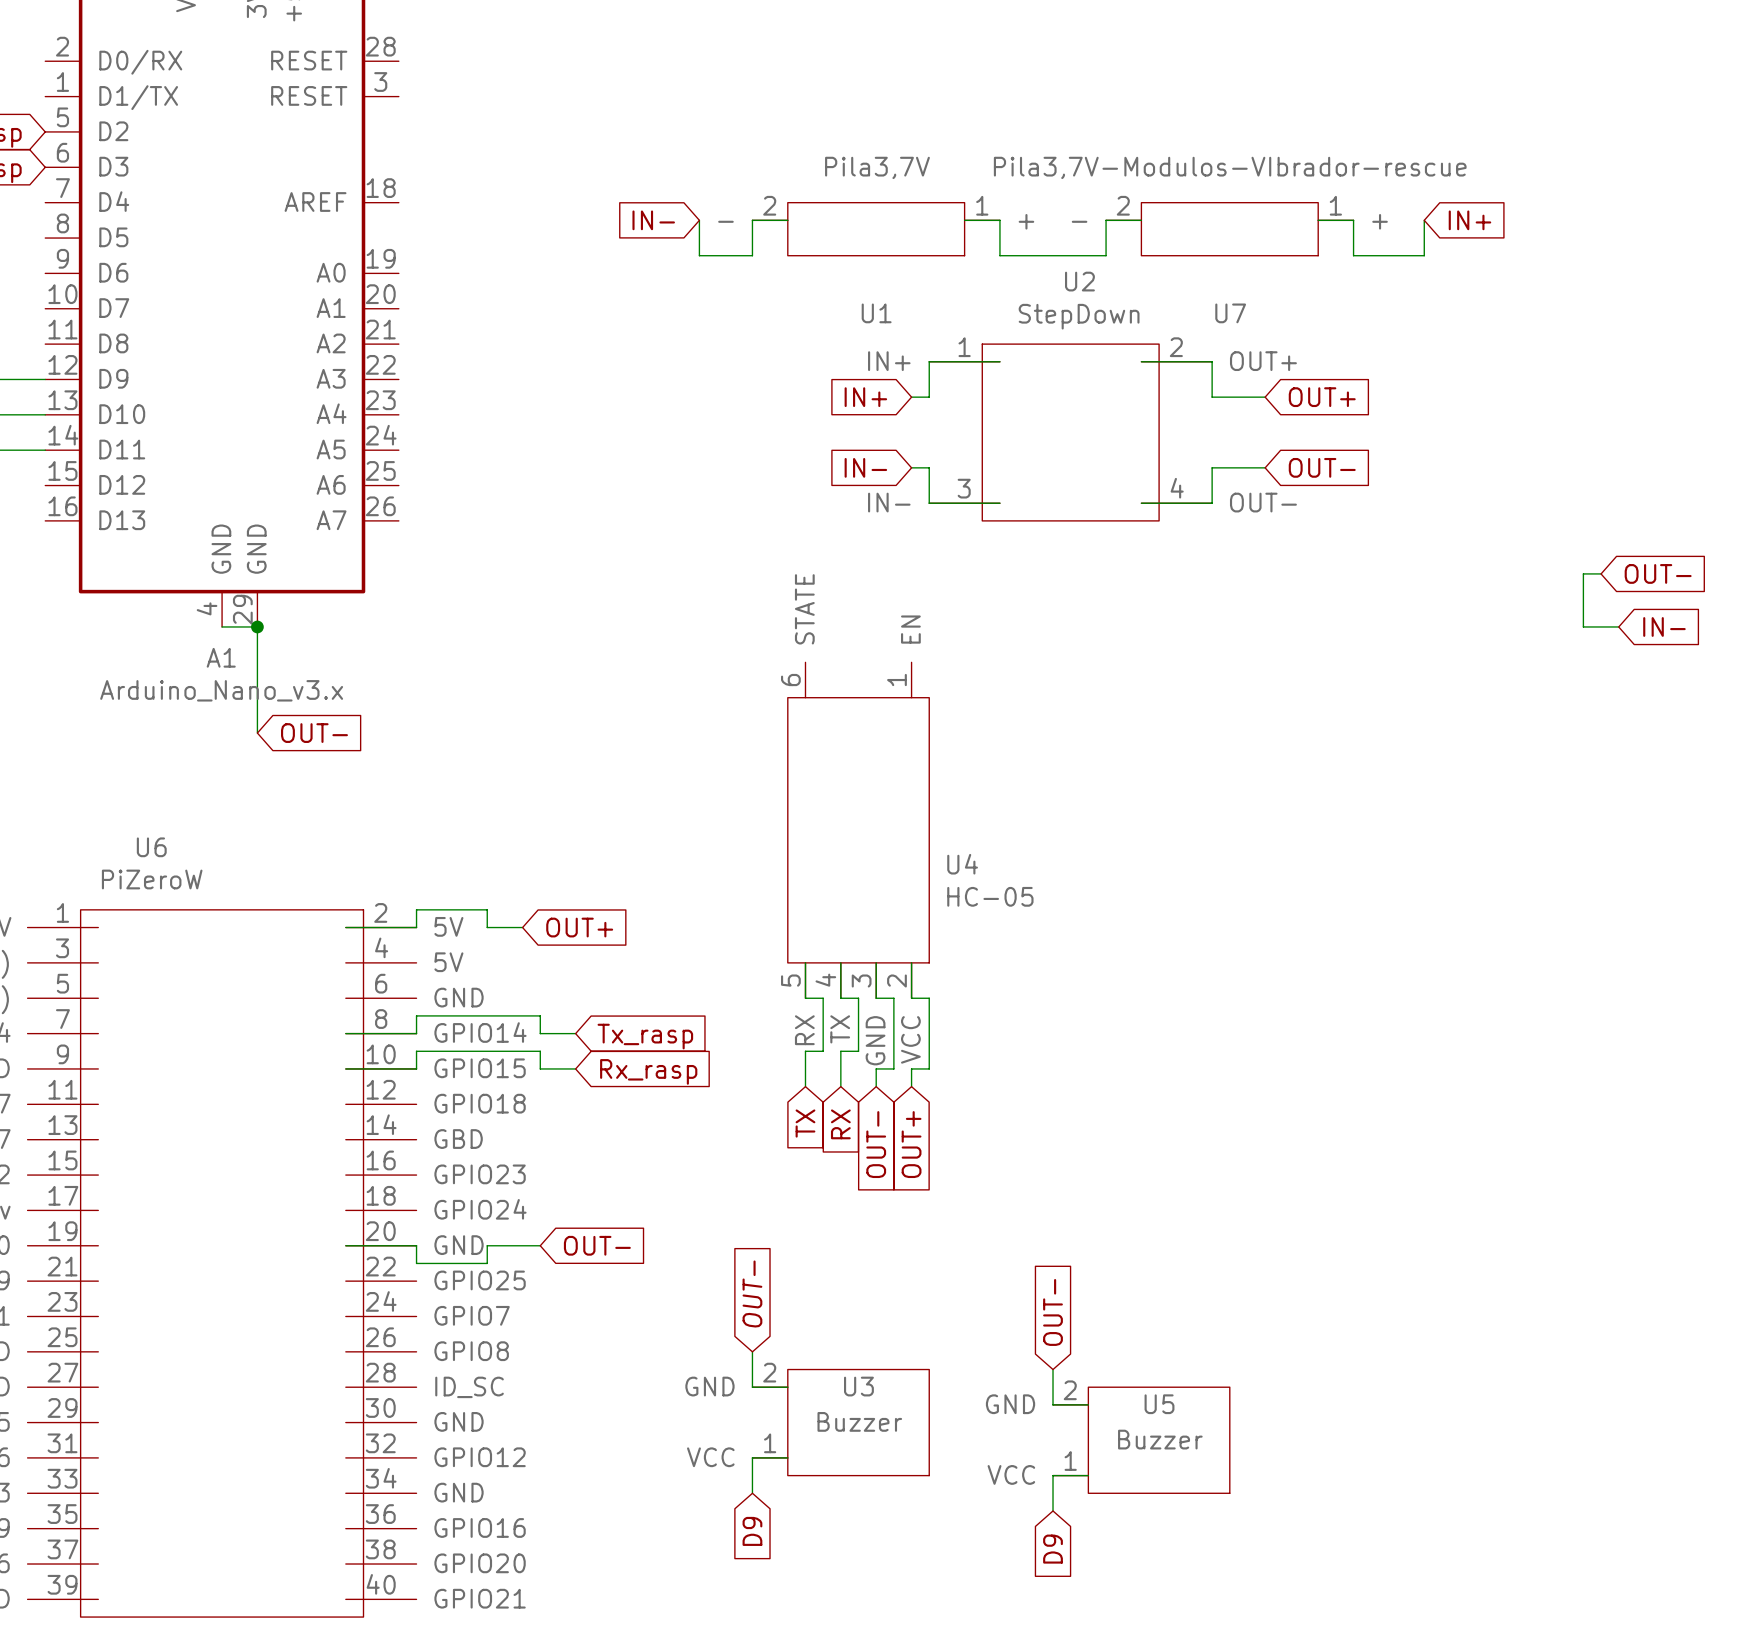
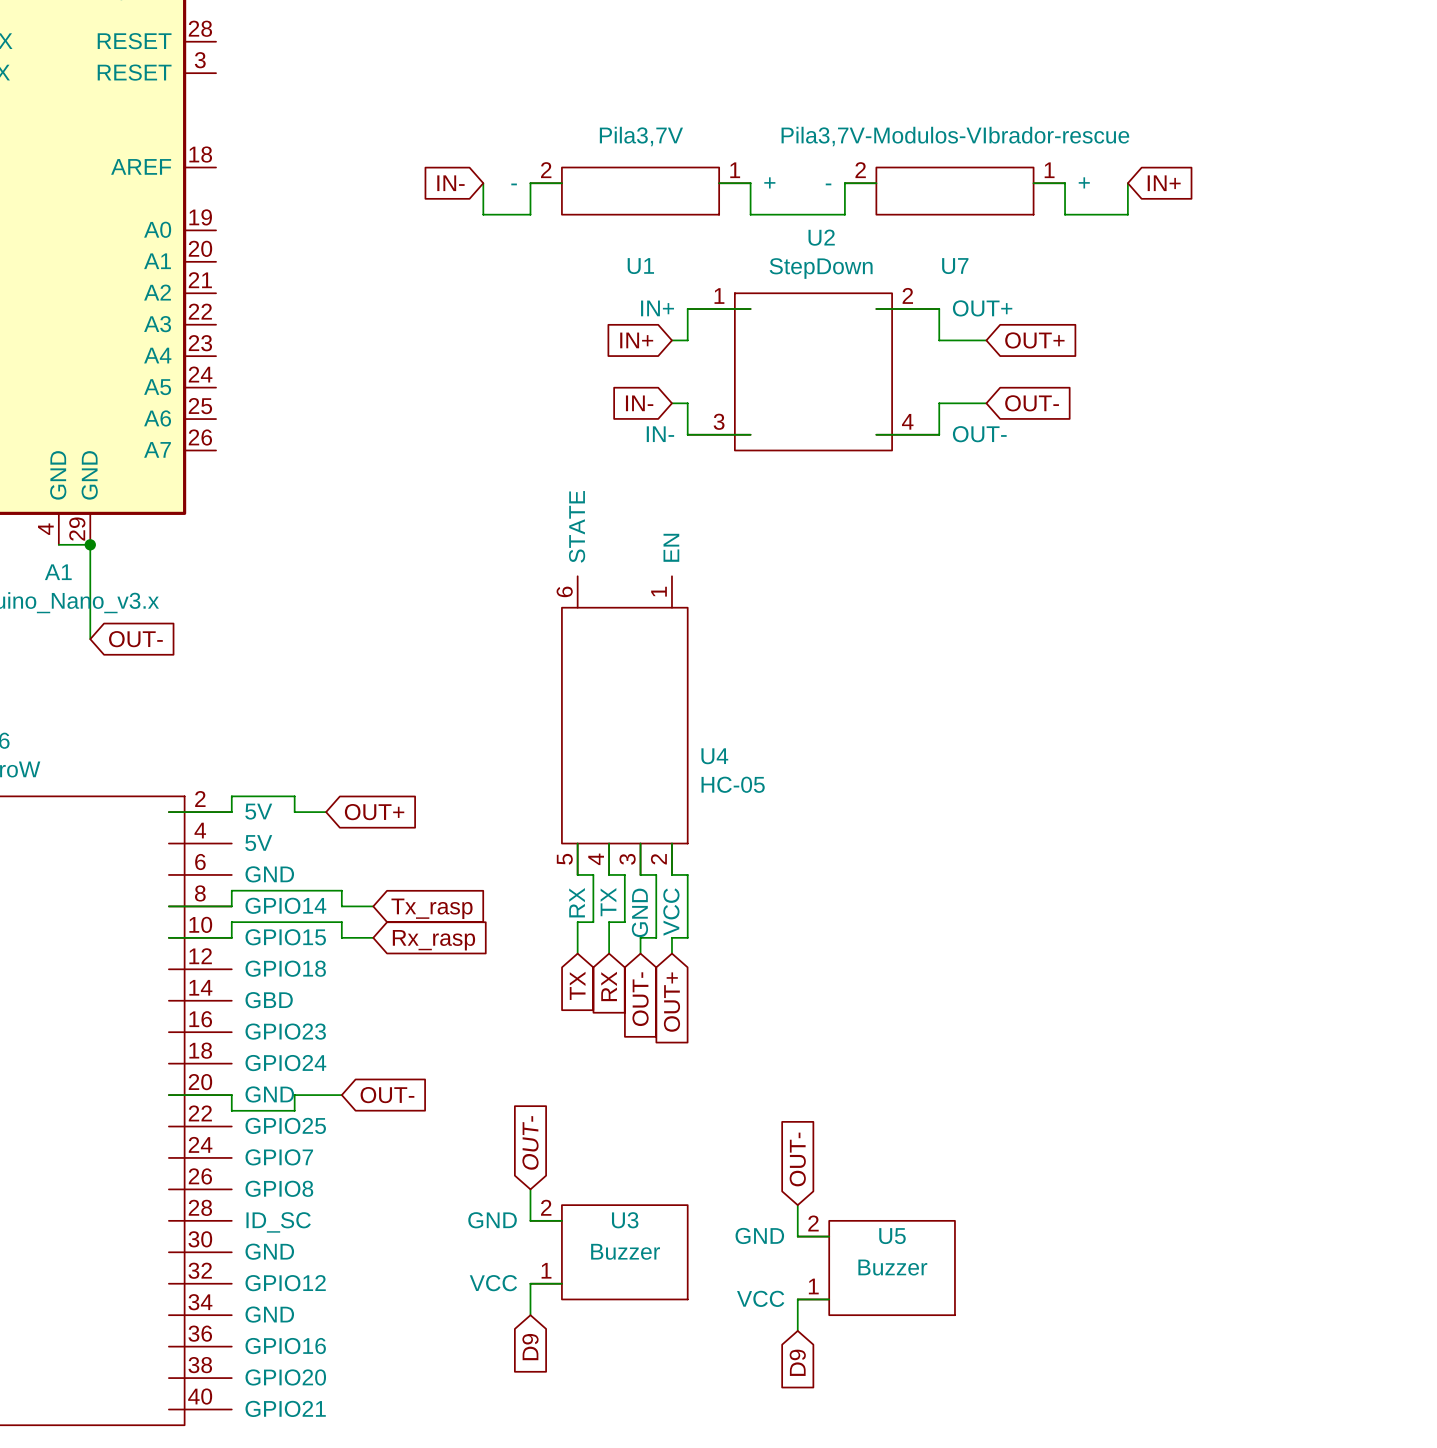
wire: (1601, 573) (1583, 573) (1583, 626) (1618, 626) -> none
global label: OUT- (1658, 573) -> none
global label: IN- (1664, 626) -> none

